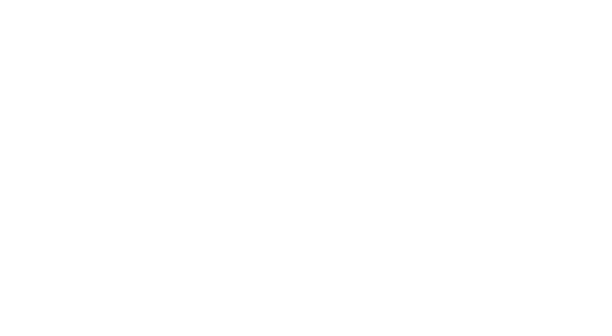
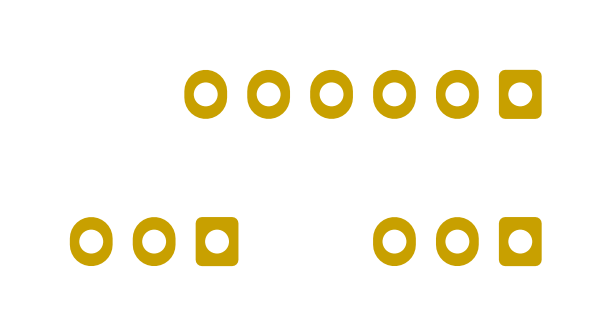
part: none -> (363, 94)
part: none -> (154, 241)
part: none -> (457, 241)

